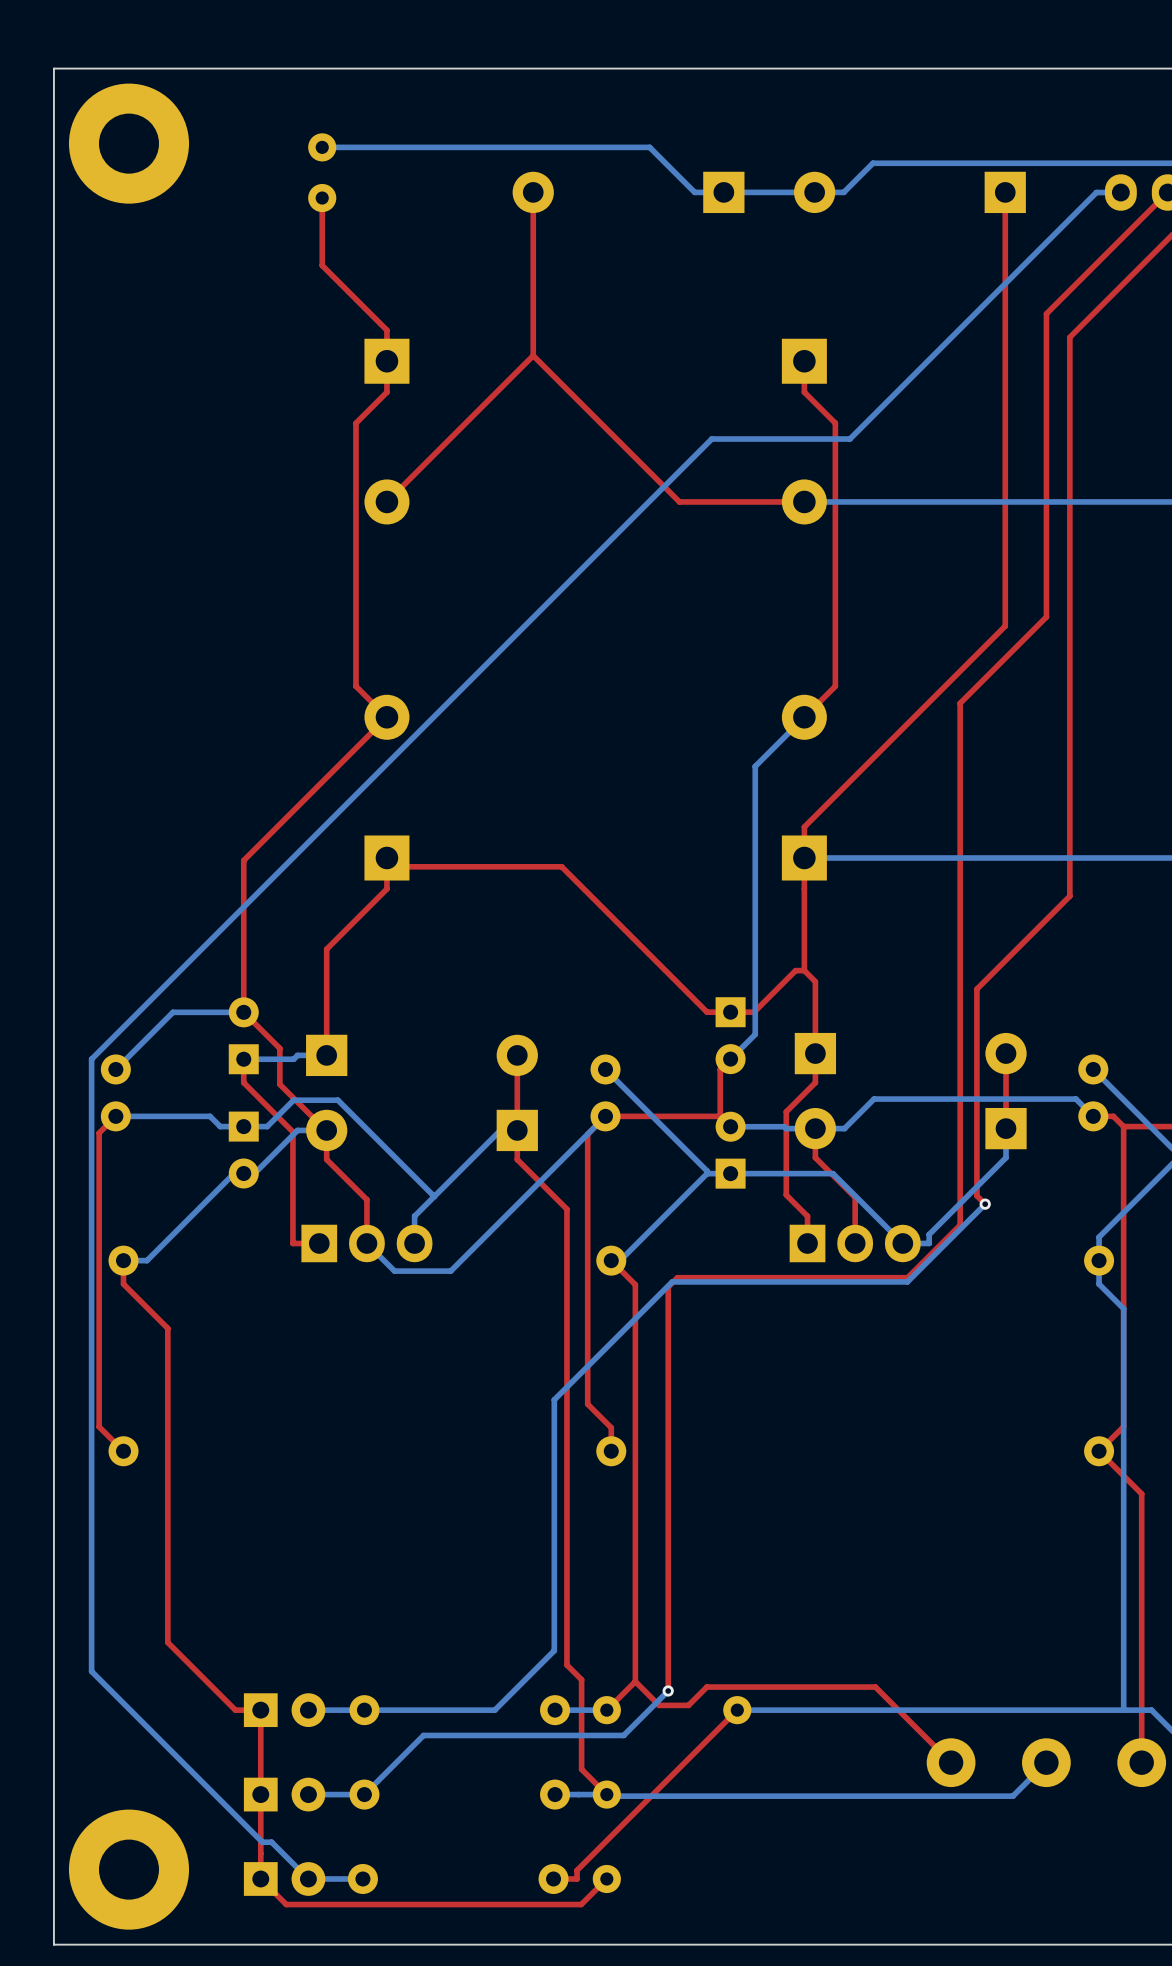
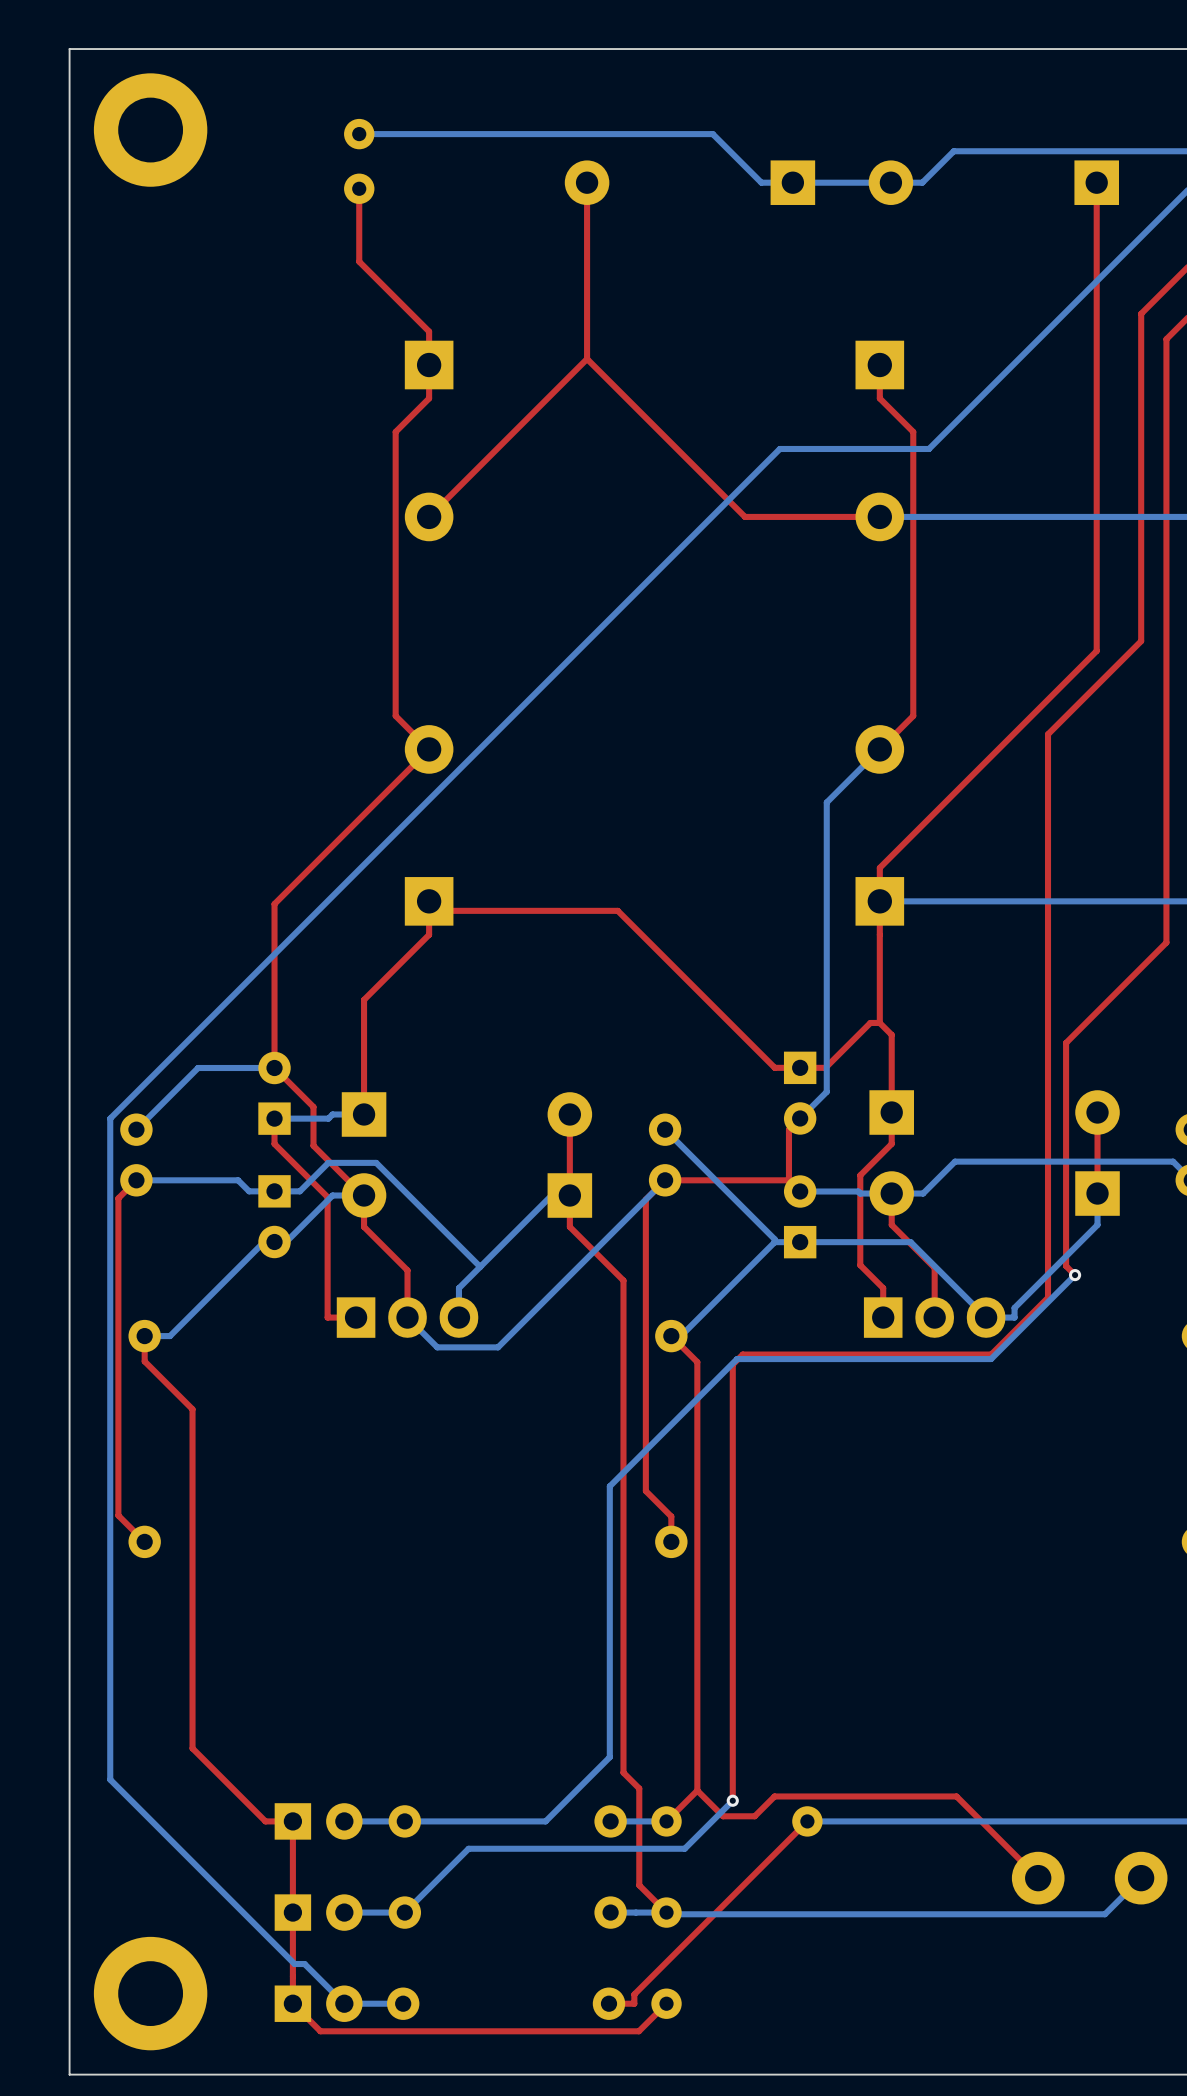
part footprint: [68, 83, 190, 204] -> [93, 73, 208, 187]
part footprint: [68, 1809, 190, 1930] -> [93, 1936, 208, 2051]

